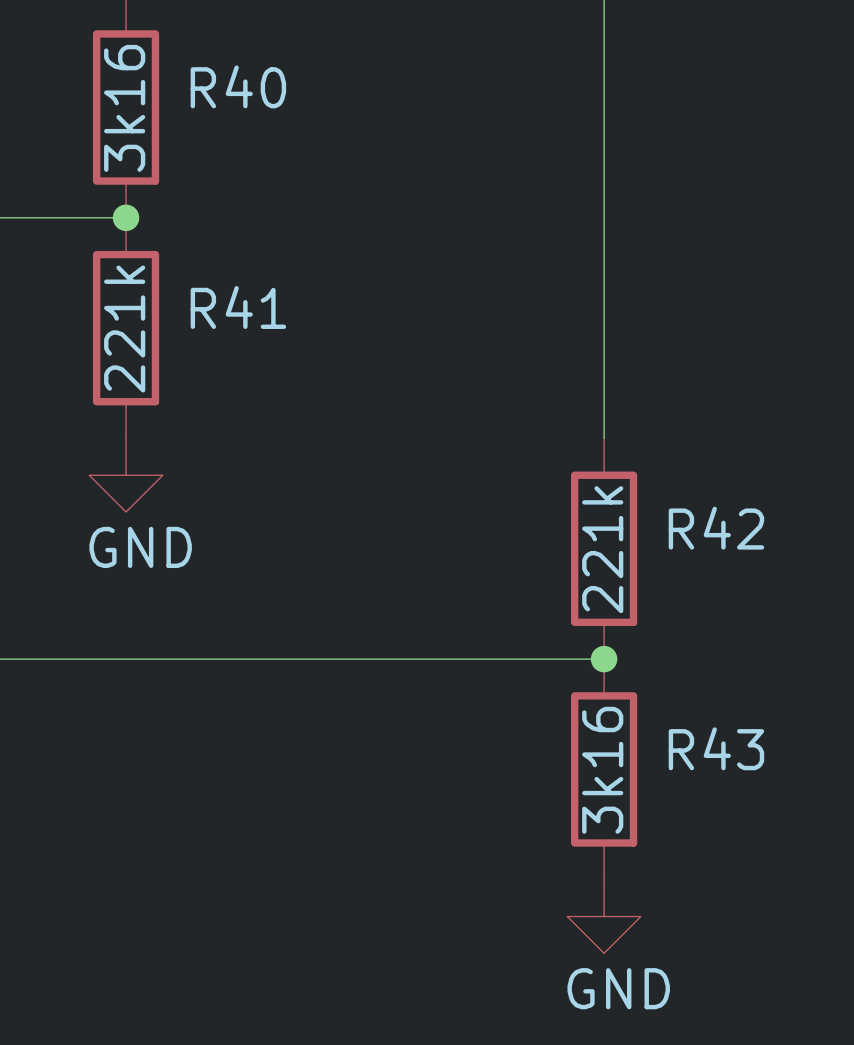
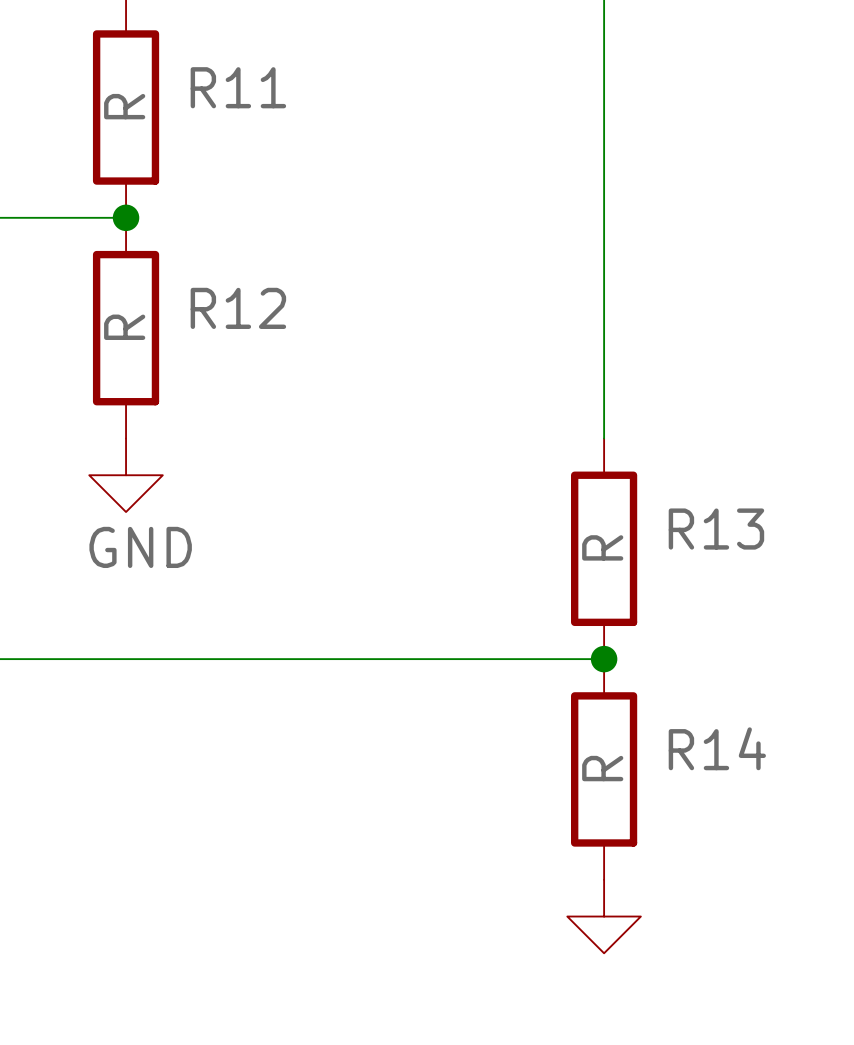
R40 name: R40 (238, 86) -> R11 (238, 87)
R40 value: 3k16 (124, 108) -> R (124, 106)
R41 name: R41 (238, 307) -> R12 (238, 308)
R41 value: 221k (124, 329) -> R (124, 327)
R42 name: R42 (716, 528) -> R13 (716, 529)
R42 value: 221k (602, 549) -> R (602, 547)
R43 name: R43 (716, 748) -> R14 (717, 748)
R43 value: 3k16 (602, 770) -> R (602, 768)
power symbol text: GND (618, 988) -> none

